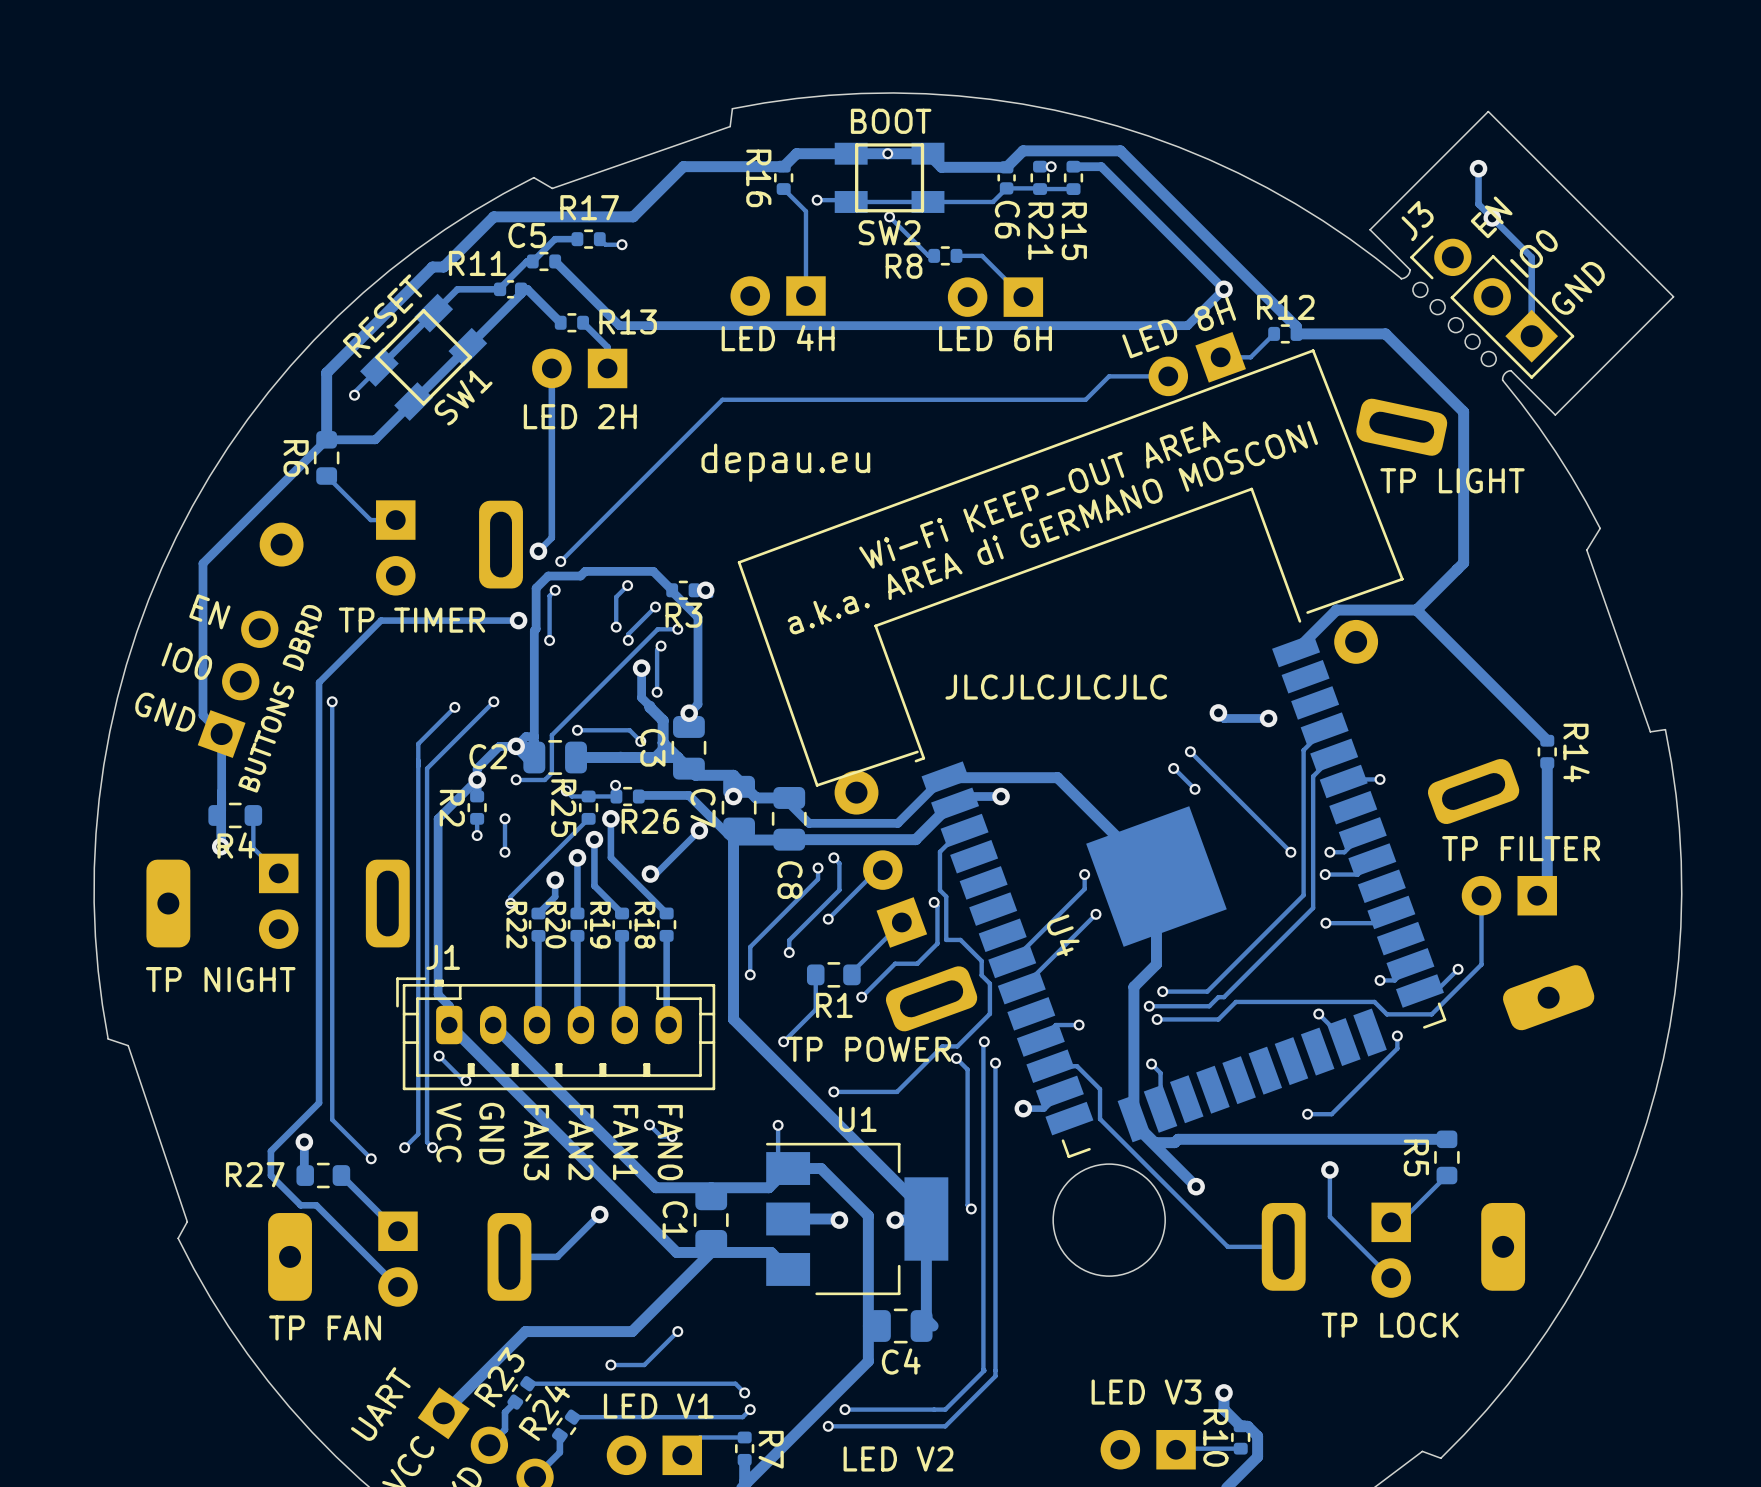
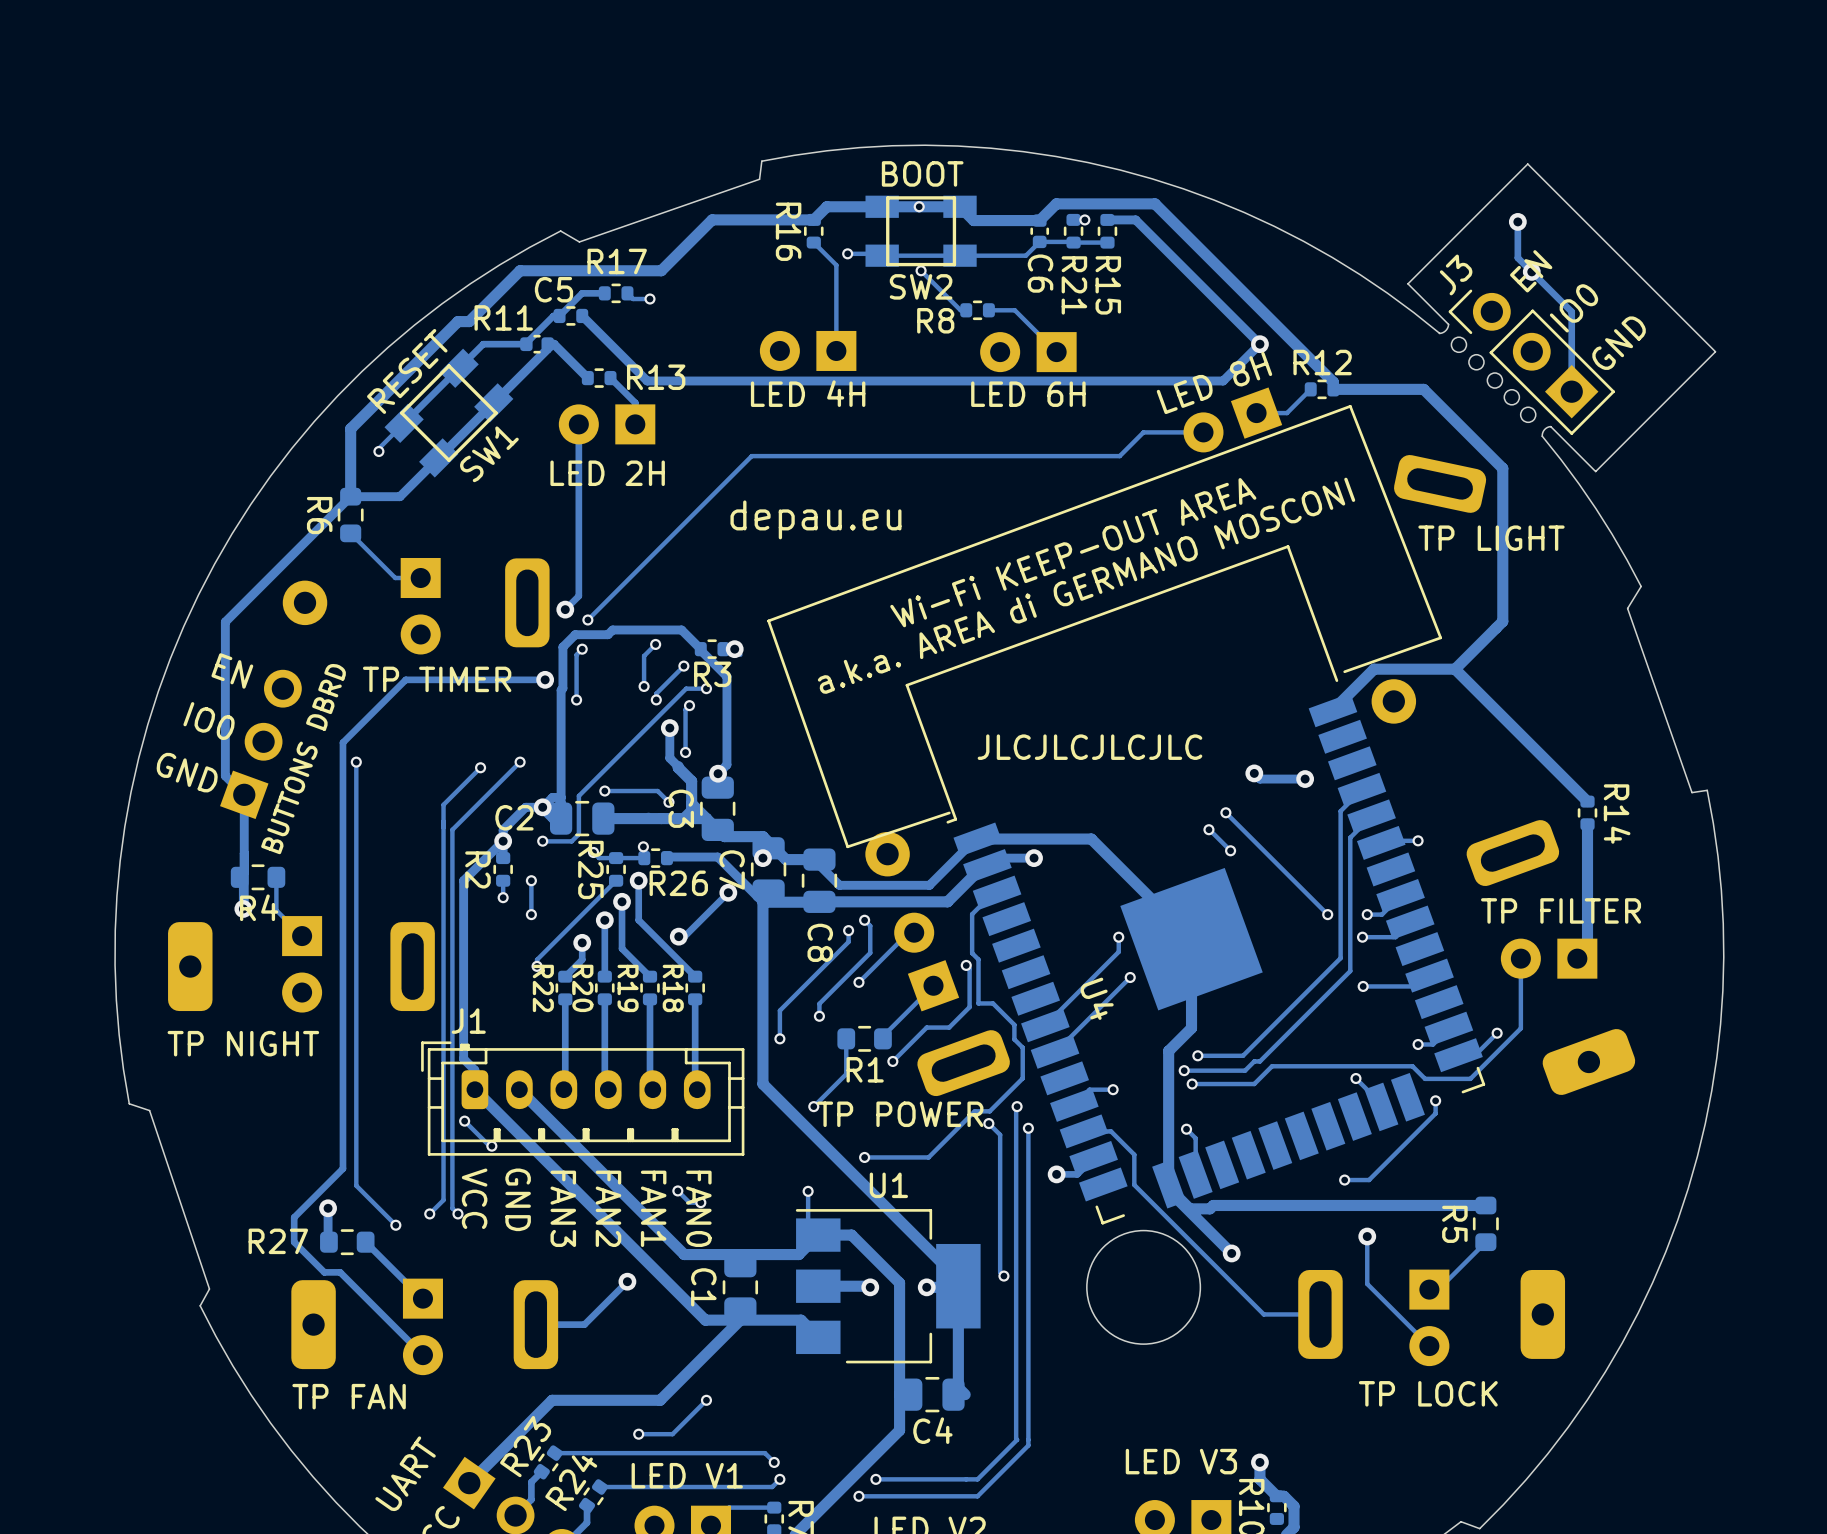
track: (1240, 1448) (1176, 1449) -> none

